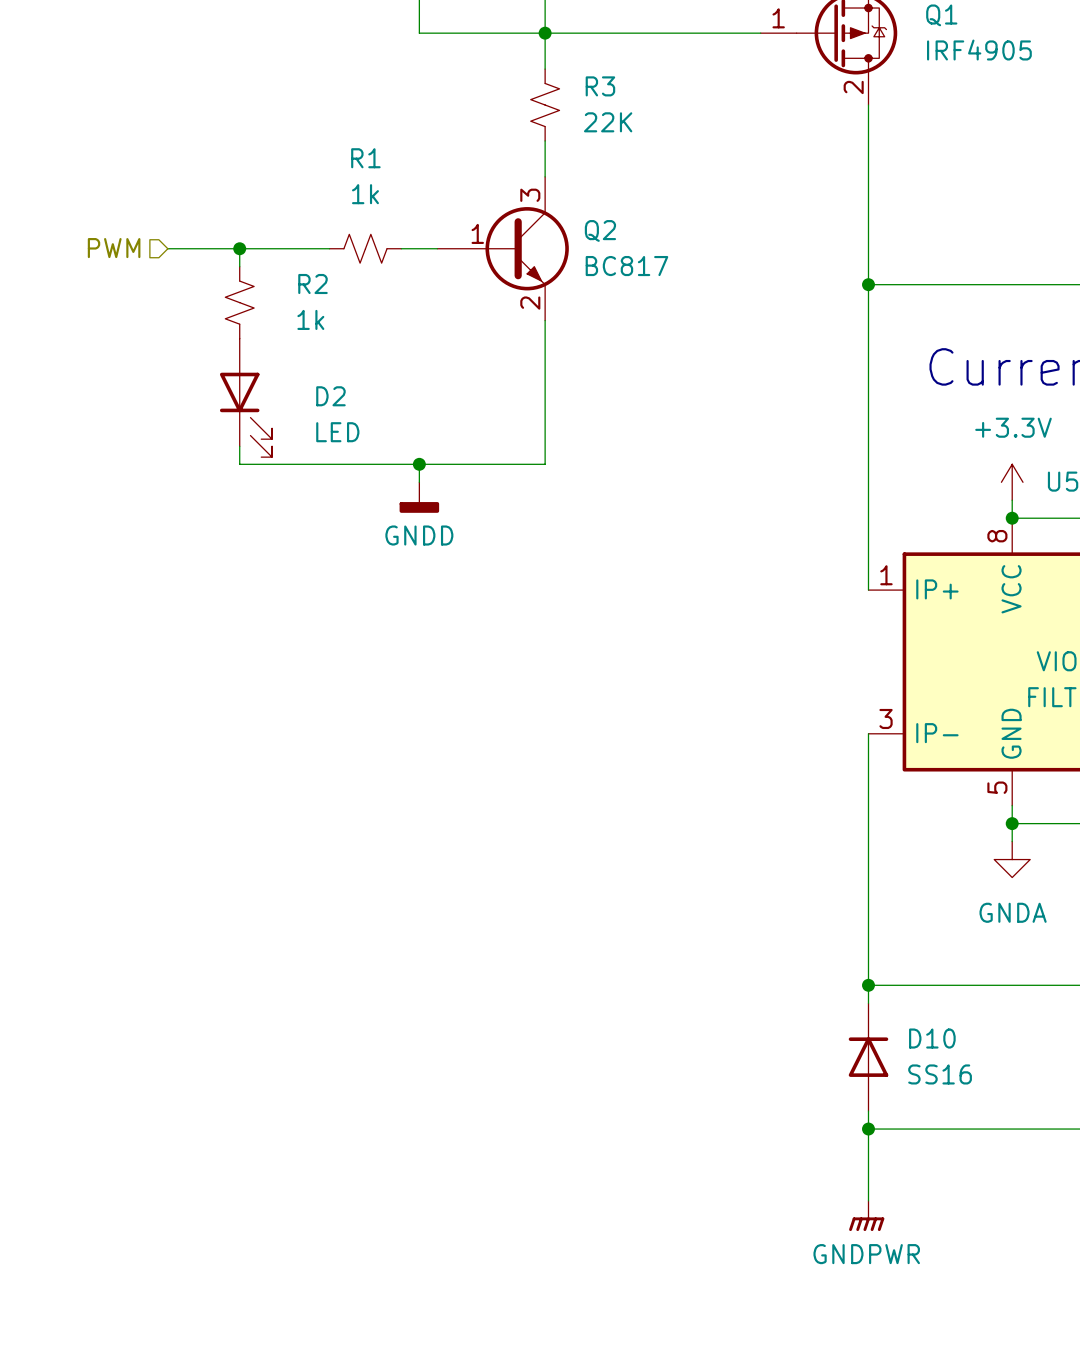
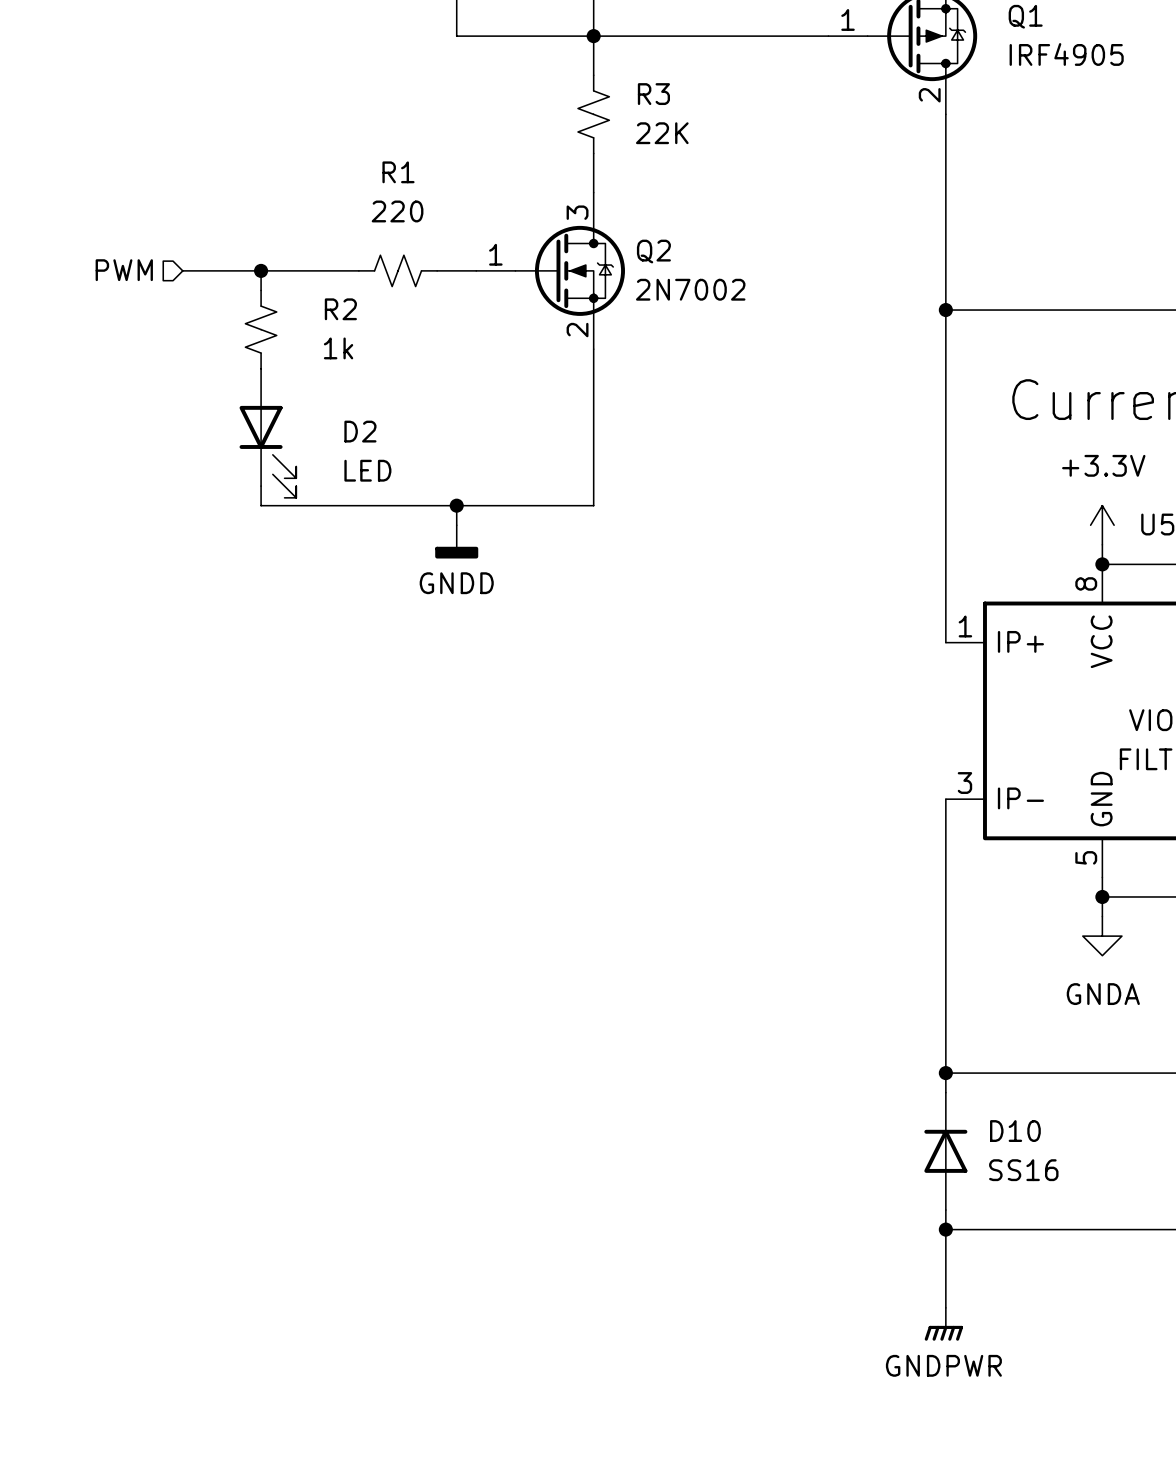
Q2 symbol: [437, 176, 569, 321] -> [476, 192, 625, 350]
R1 value: 1k (365, 194) -> 220 (397, 211)
Q2 value: BC817 (626, 266) -> 2N7002 (690, 289)

